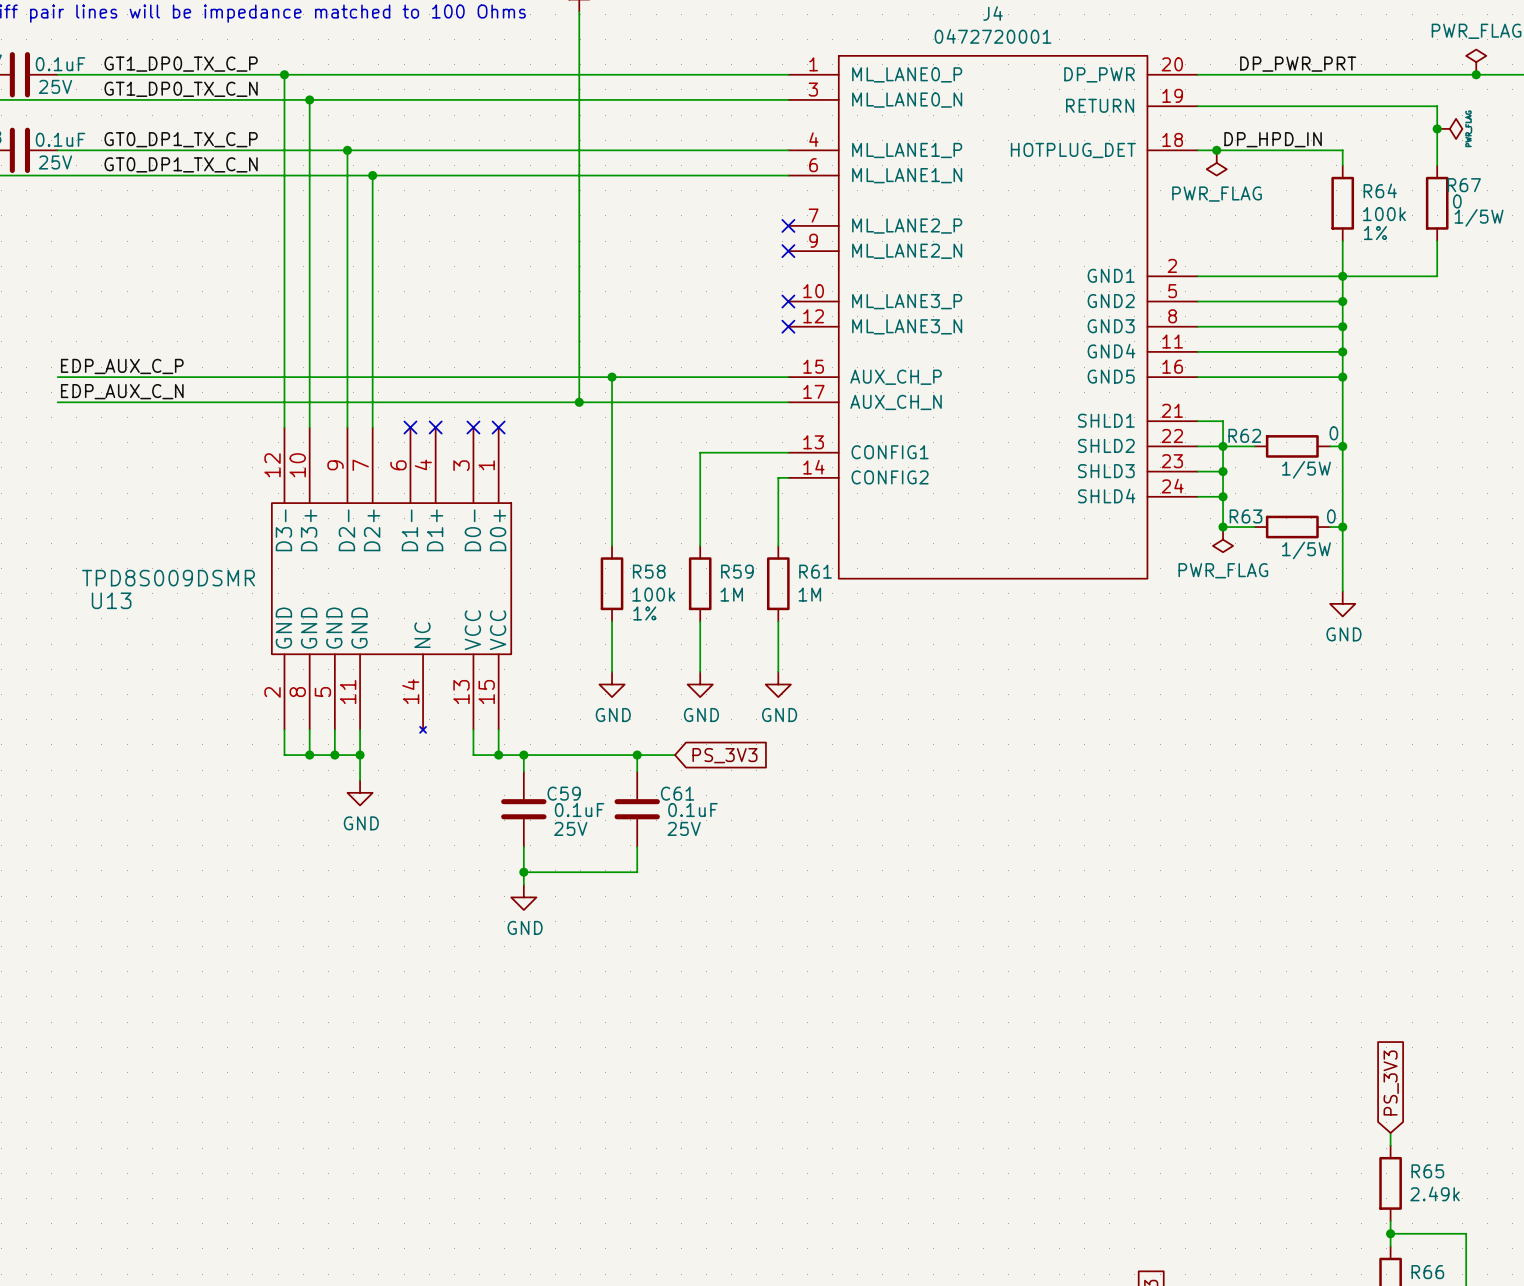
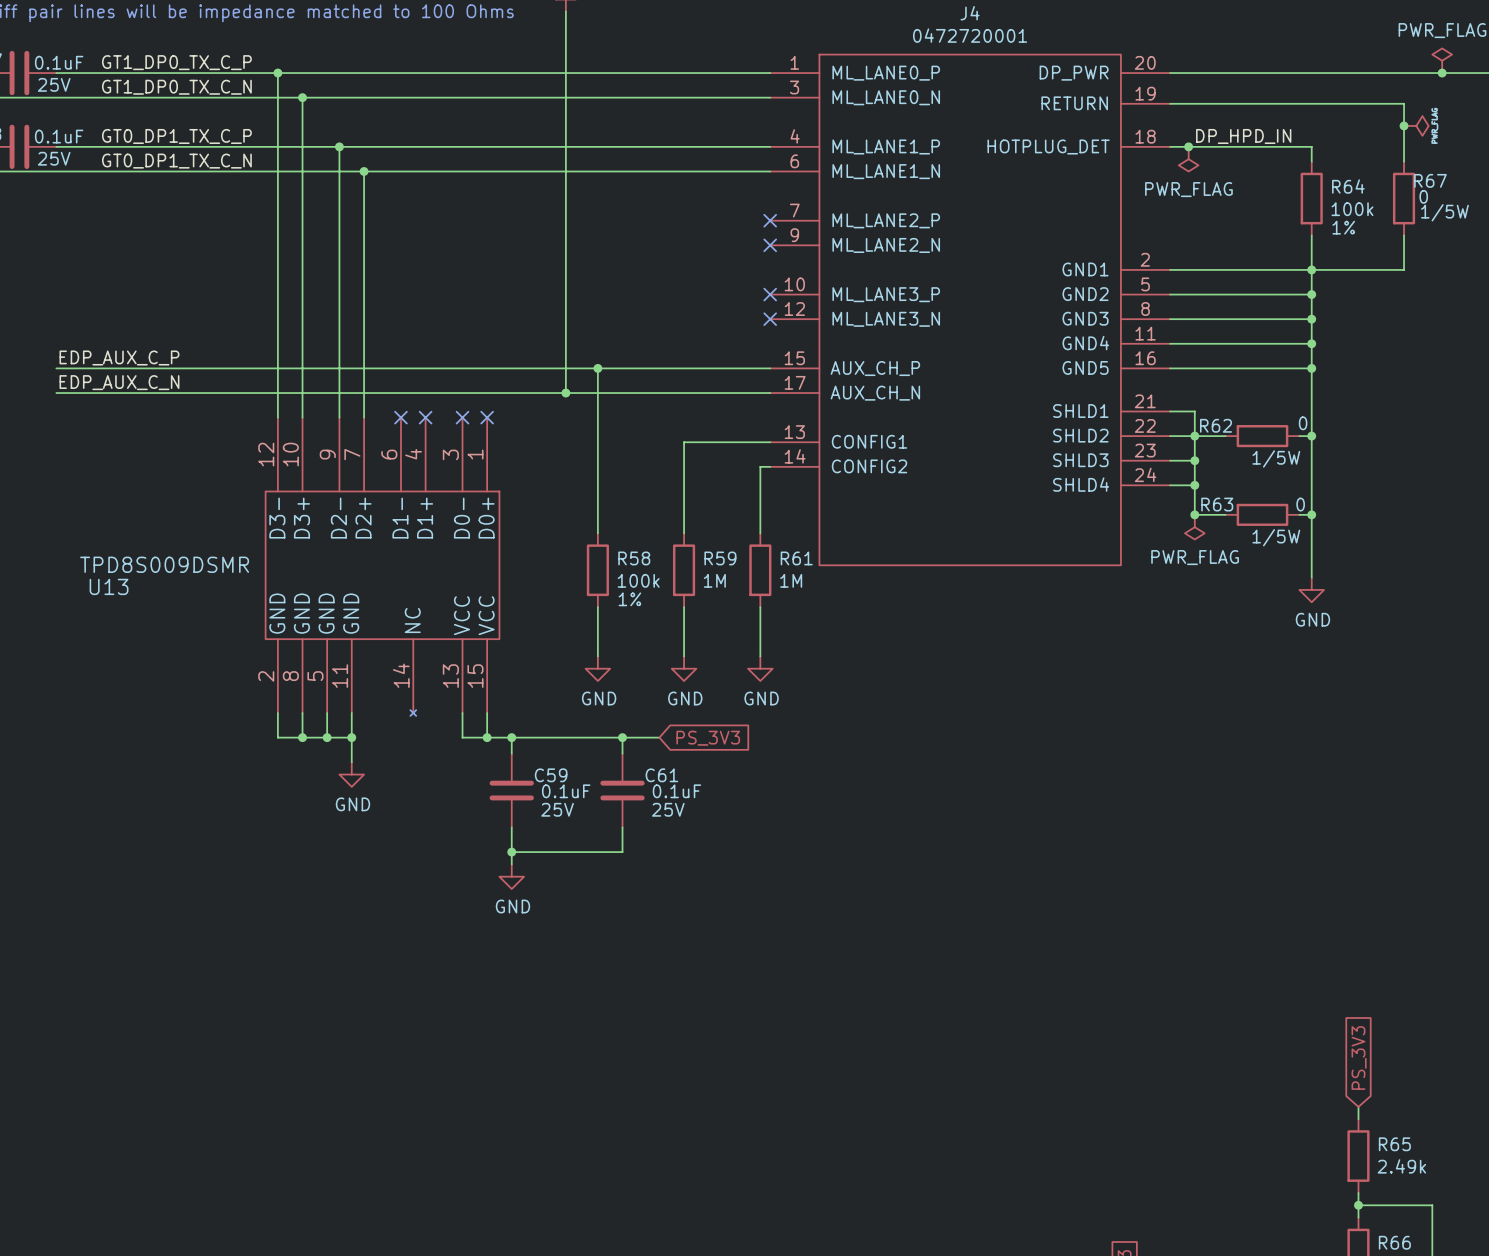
label: DP_PWR_PRT (1298, 64) -> none

